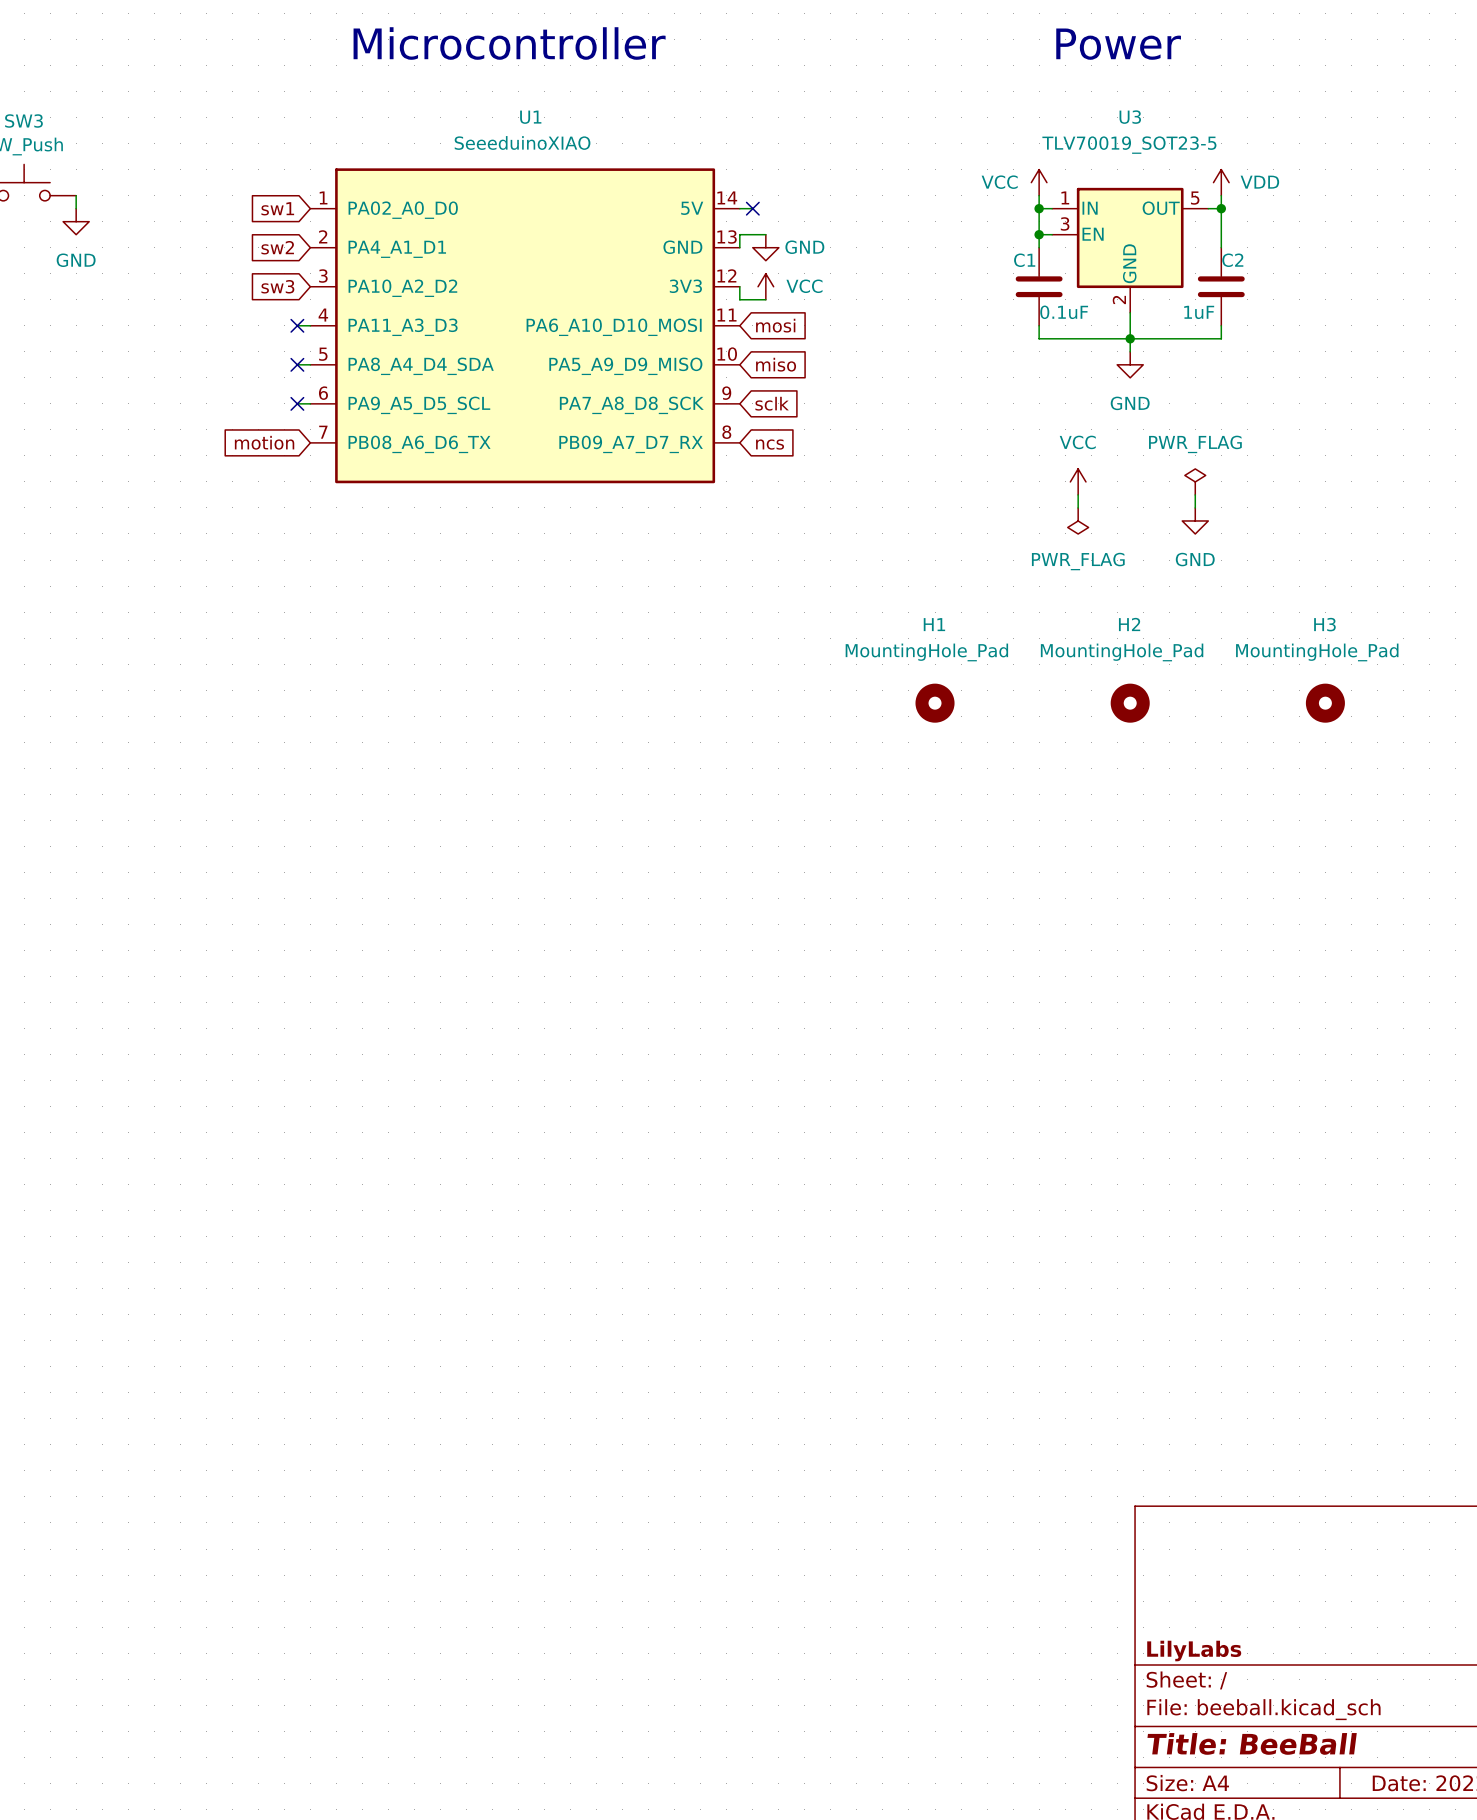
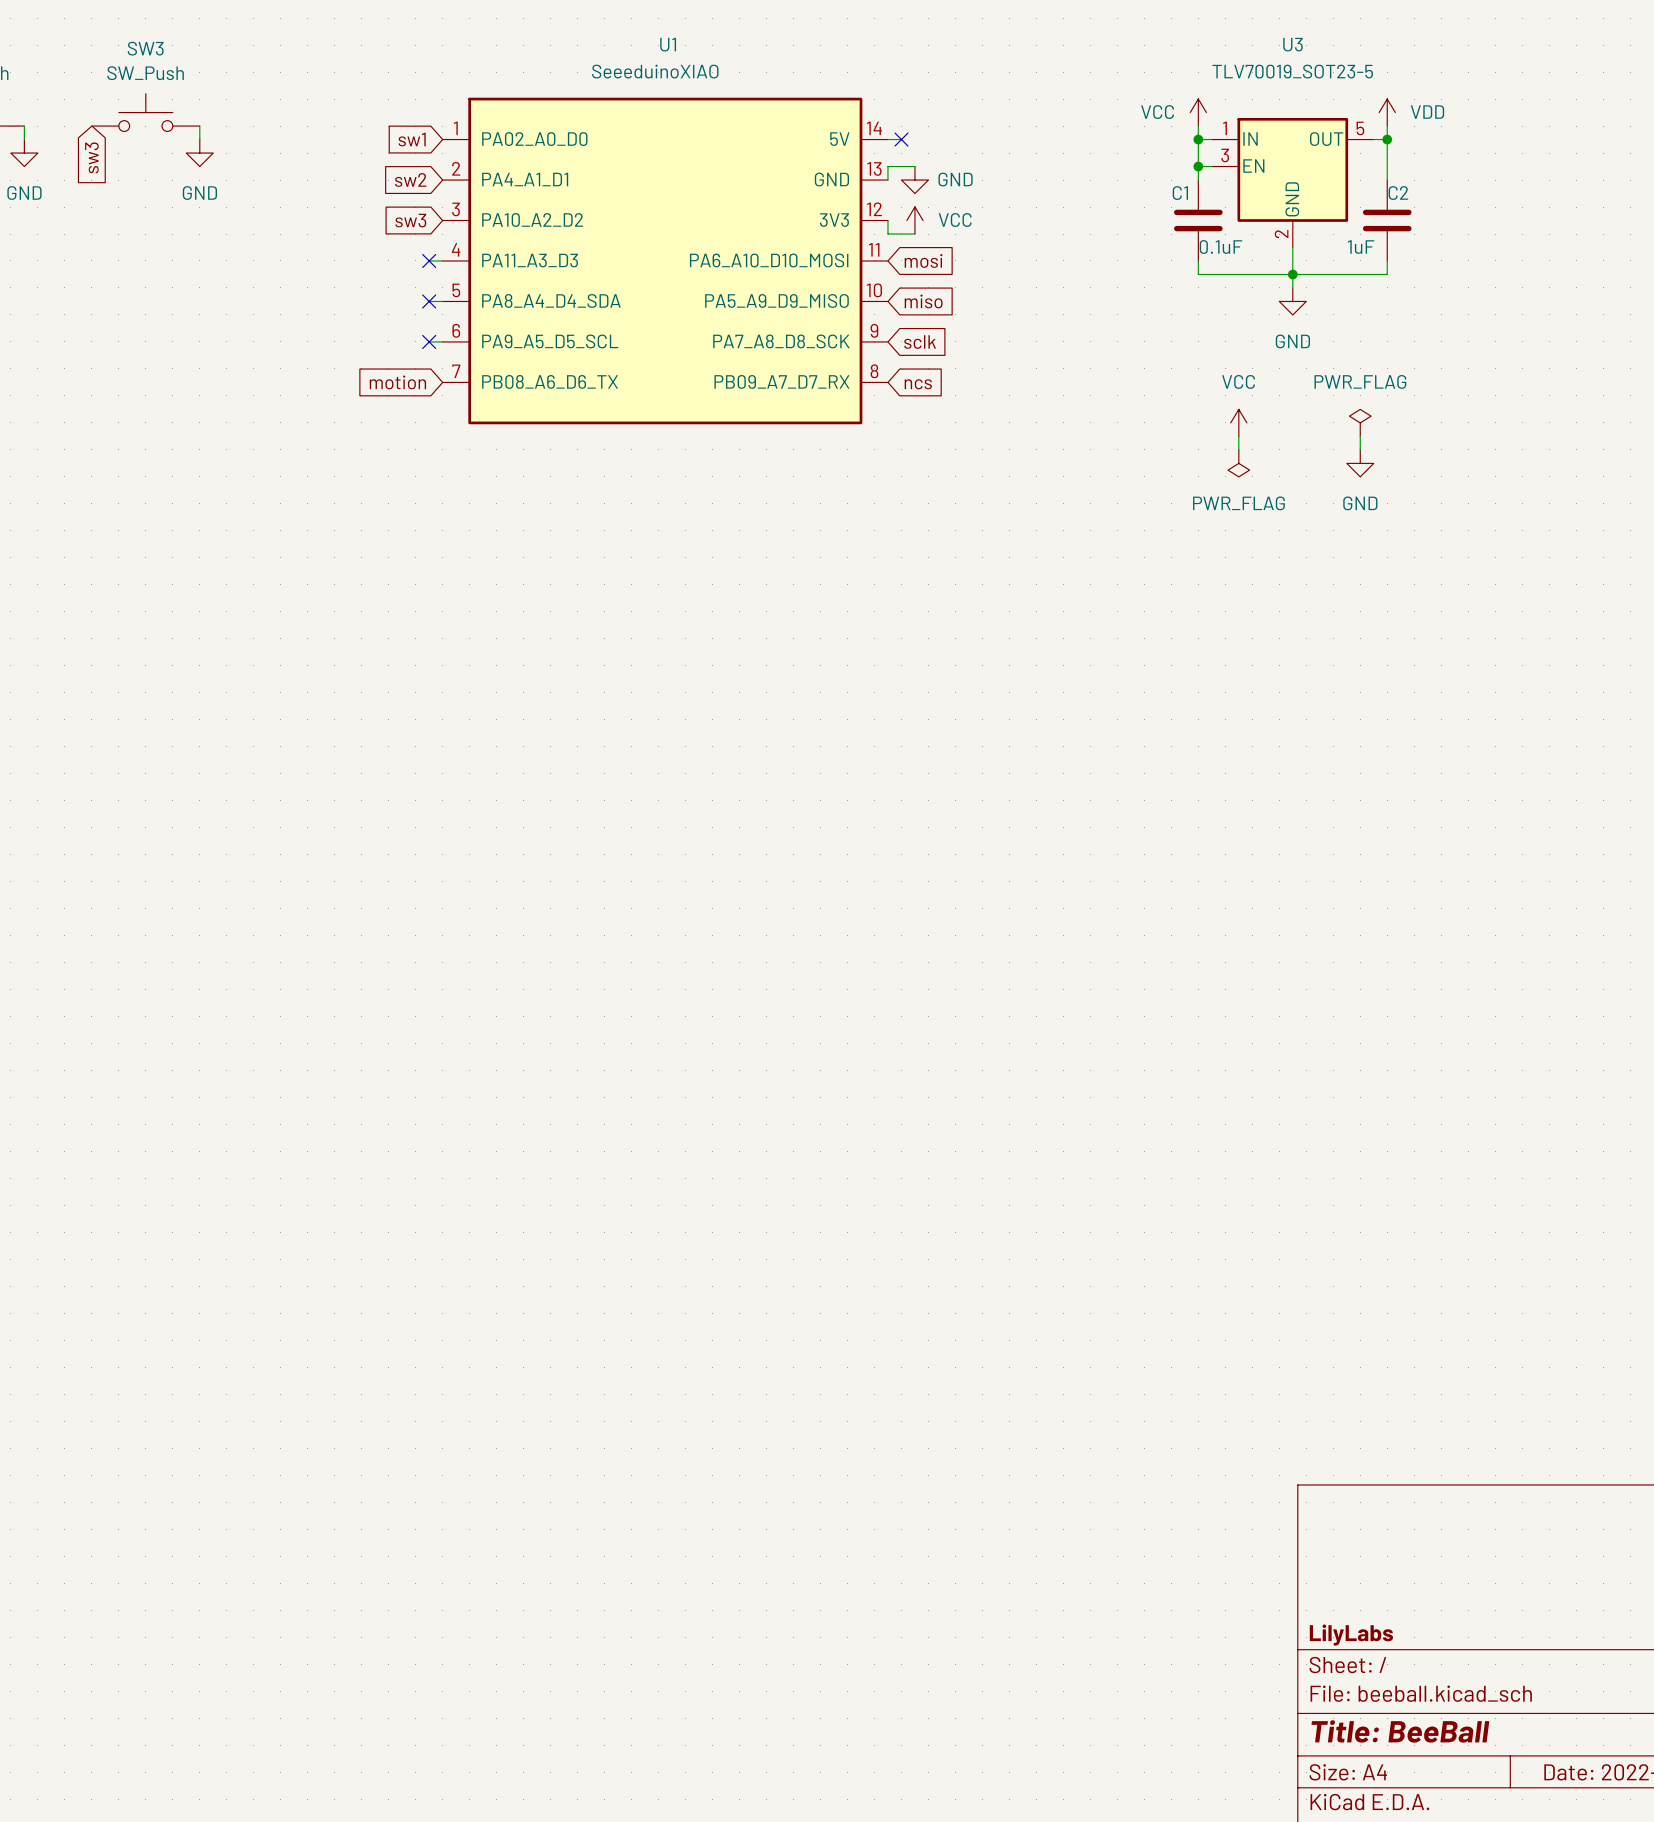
H1: MountingHole_Pad (935, 703) -> none
H2: MountingHole_Pad (1130, 703) -> none
H3: MountingHole_Pad (1325, 703) -> none

